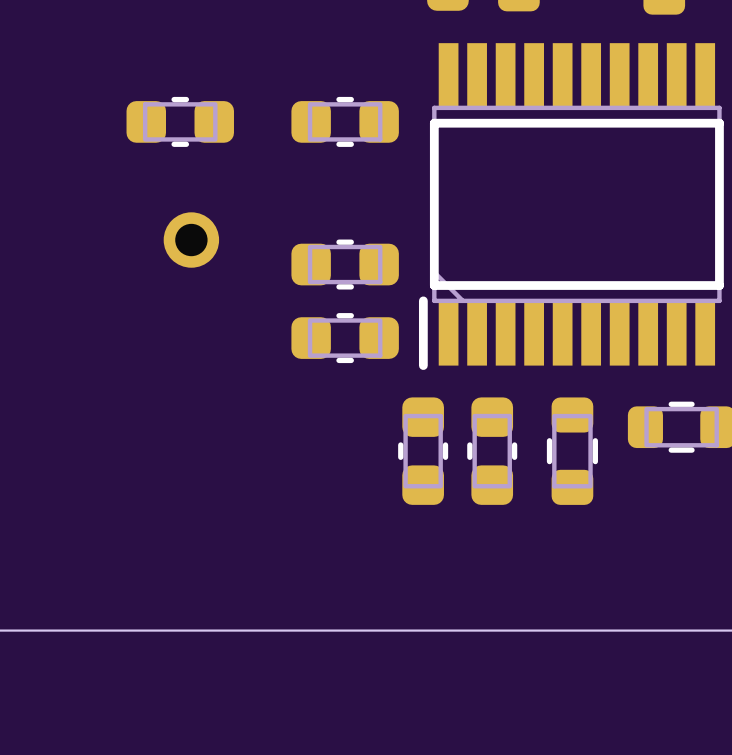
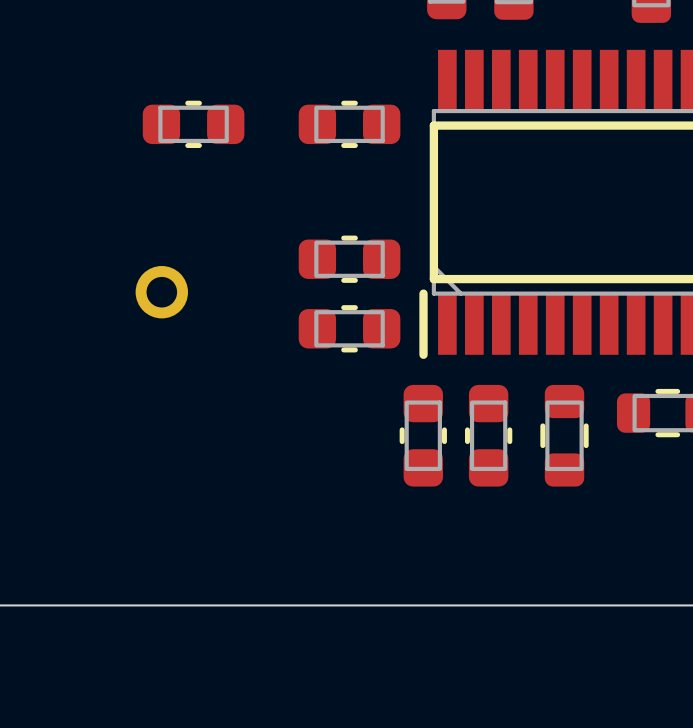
part position: (191, 240) -> (161, 292)

